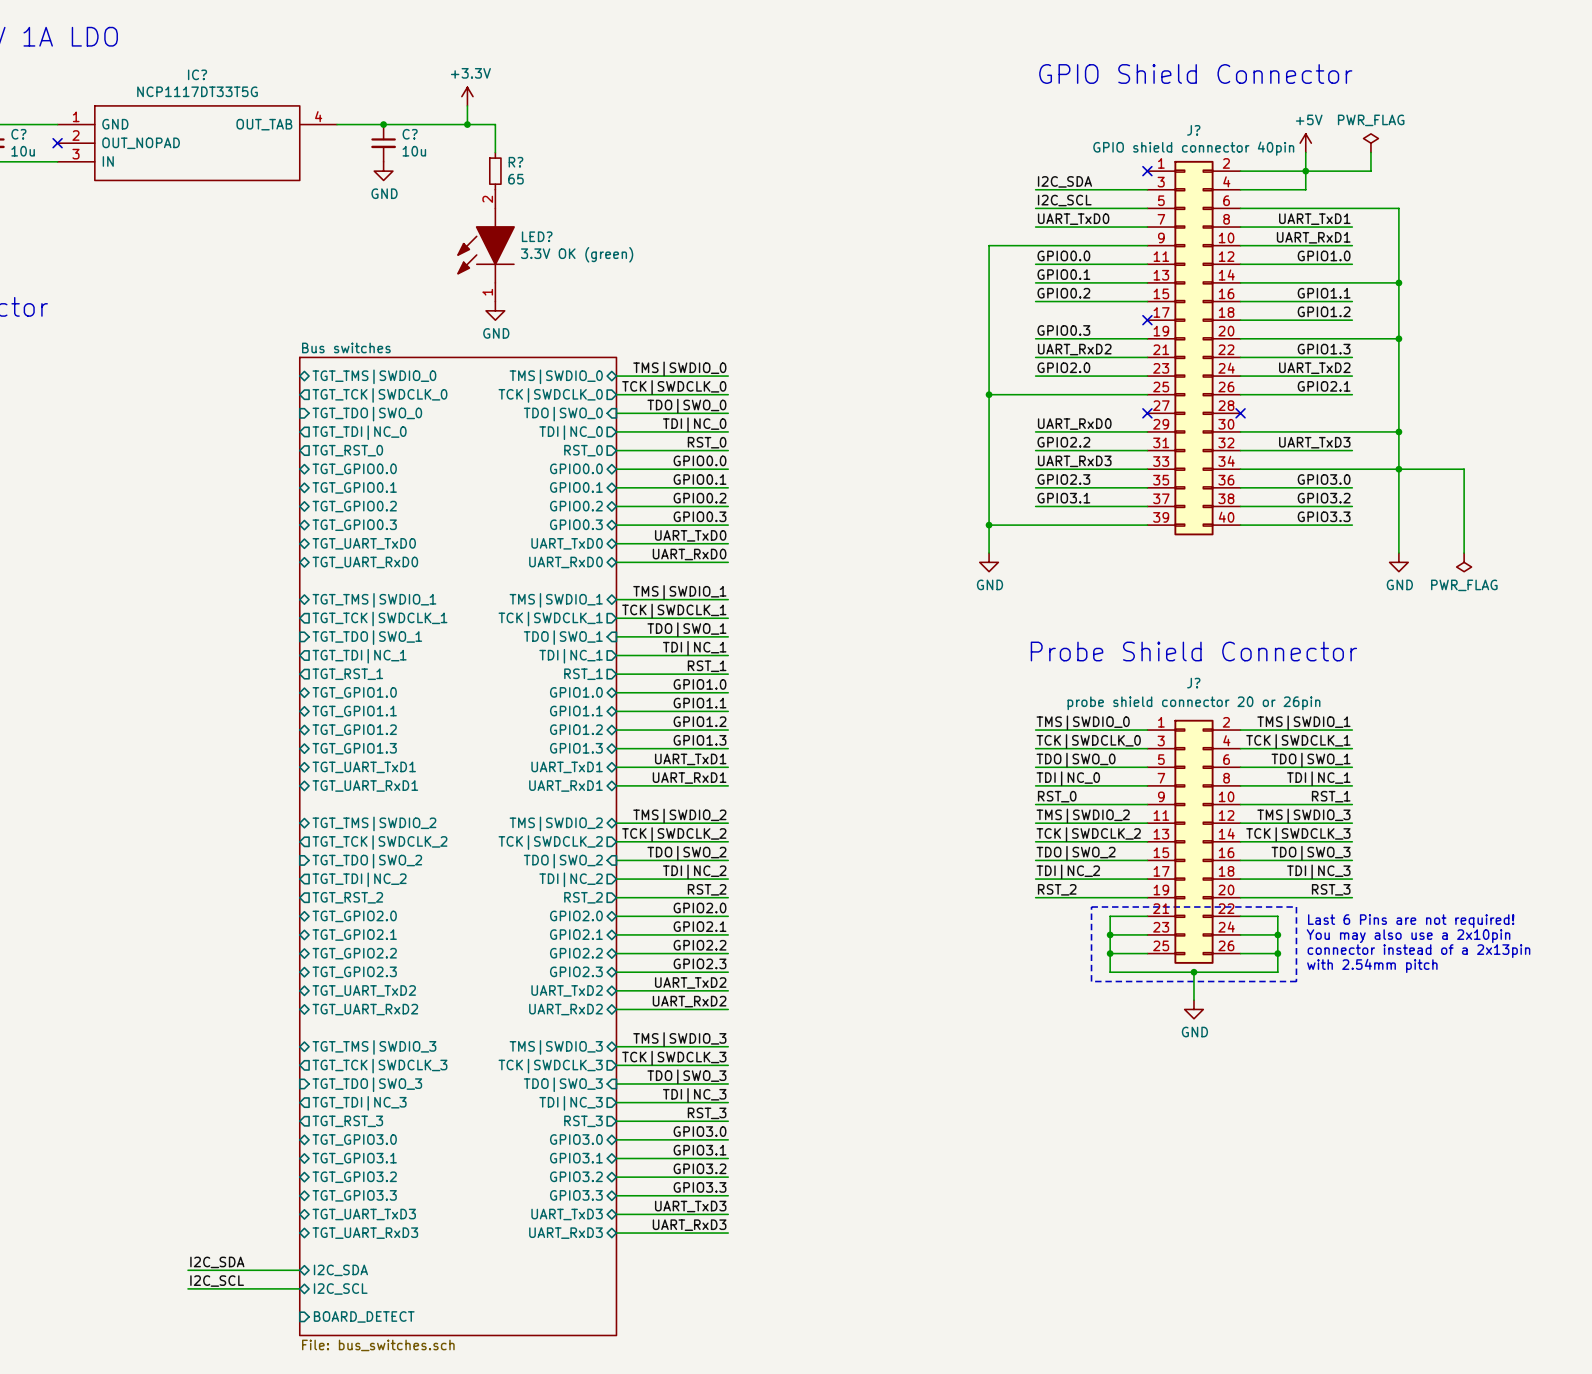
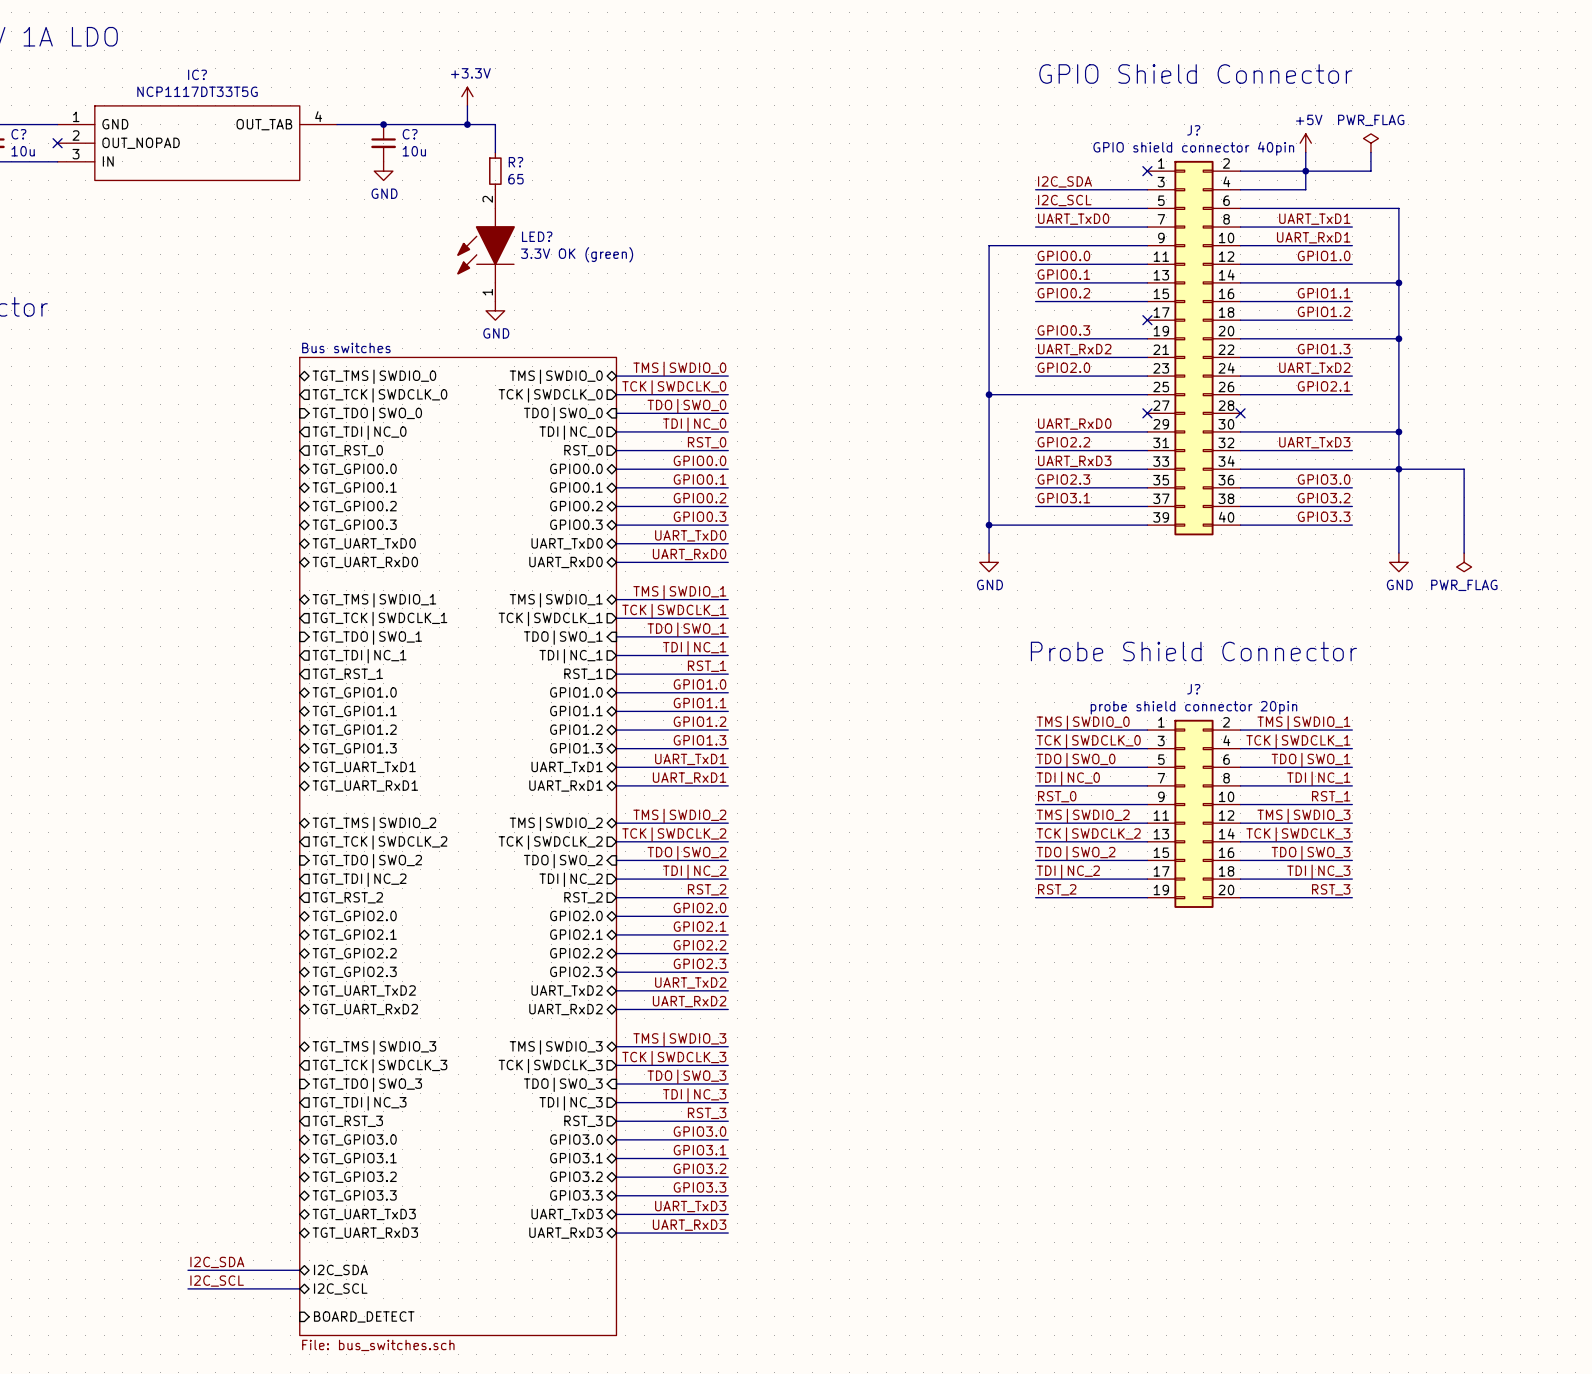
J?: none -> probe shield connector 20pin (1193, 813)
J?: probe shield connector 20 or 26pin (1193, 841) -> none
line: (1091, 907) (1091, 981) (1296, 981) (1296, 907) (1091, 907) -> none
wire: (1147, 916) (1110, 916) (1110, 972) (1277, 972) (1277, 916) (1240, 916) -> none
text: Last 6 Pins are not required! (1411, 921) -> none
wire: (1110, 934) (1147, 934) -> none
junction: (1110, 934) -> none
wire: (1240, 934) (1277, 934) -> none
junction: (1277, 934) -> none
text: You may also use a 2x10pin (1408, 936) -> none
text: connector instead of a 2x13pin (1418, 951) -> none
wire: (1110, 953) (1147, 953) -> none
junction: (1110, 953) -> none
wire: (1240, 953) (1277, 953) -> none
junction: (1277, 953) -> none
text: with 2.54mm pitch (1372, 965) -> none
wire: (1193, 972) (1193, 1000) -> none
junction: (1193, 972) -> none
power symbol: GND (1193, 1009) -> none

